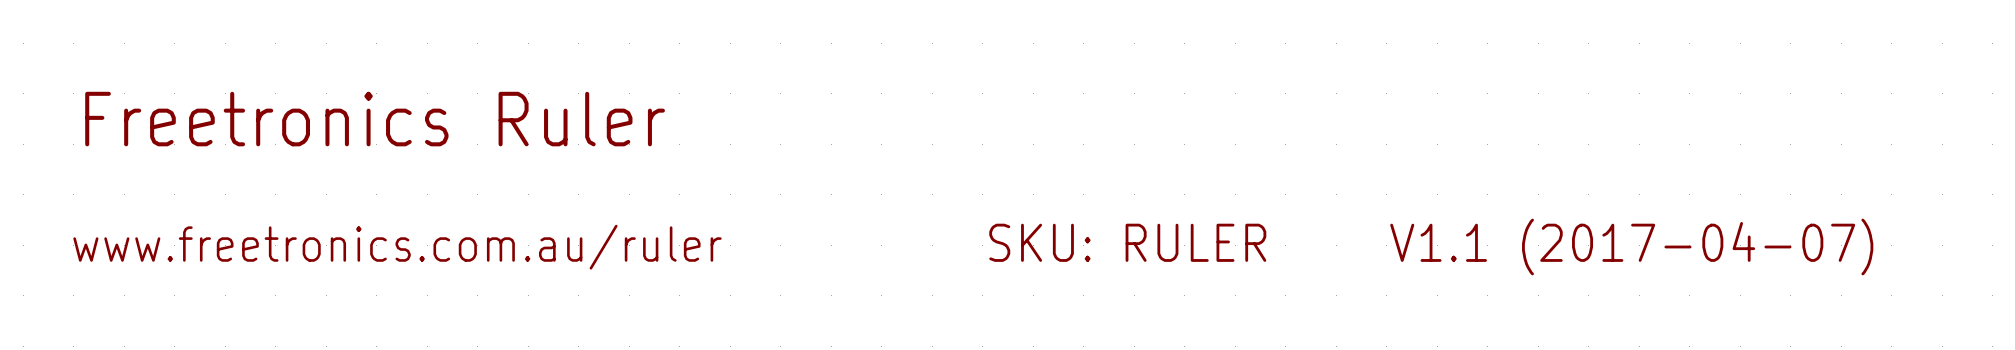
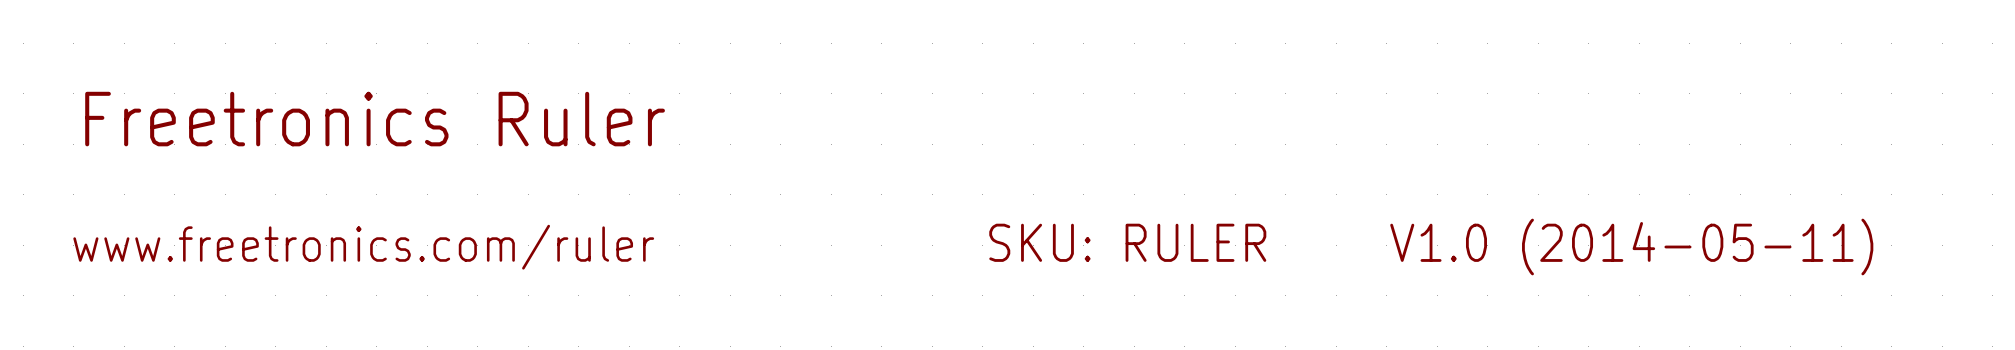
text: www.freetronics.com.au/ruler (397, 247) -> www.freetronics.com/ruler (363, 247)
text: V1.1 (2017-04-07) (1631, 247) -> V1.0 (2014-05-11) (1631, 247)

